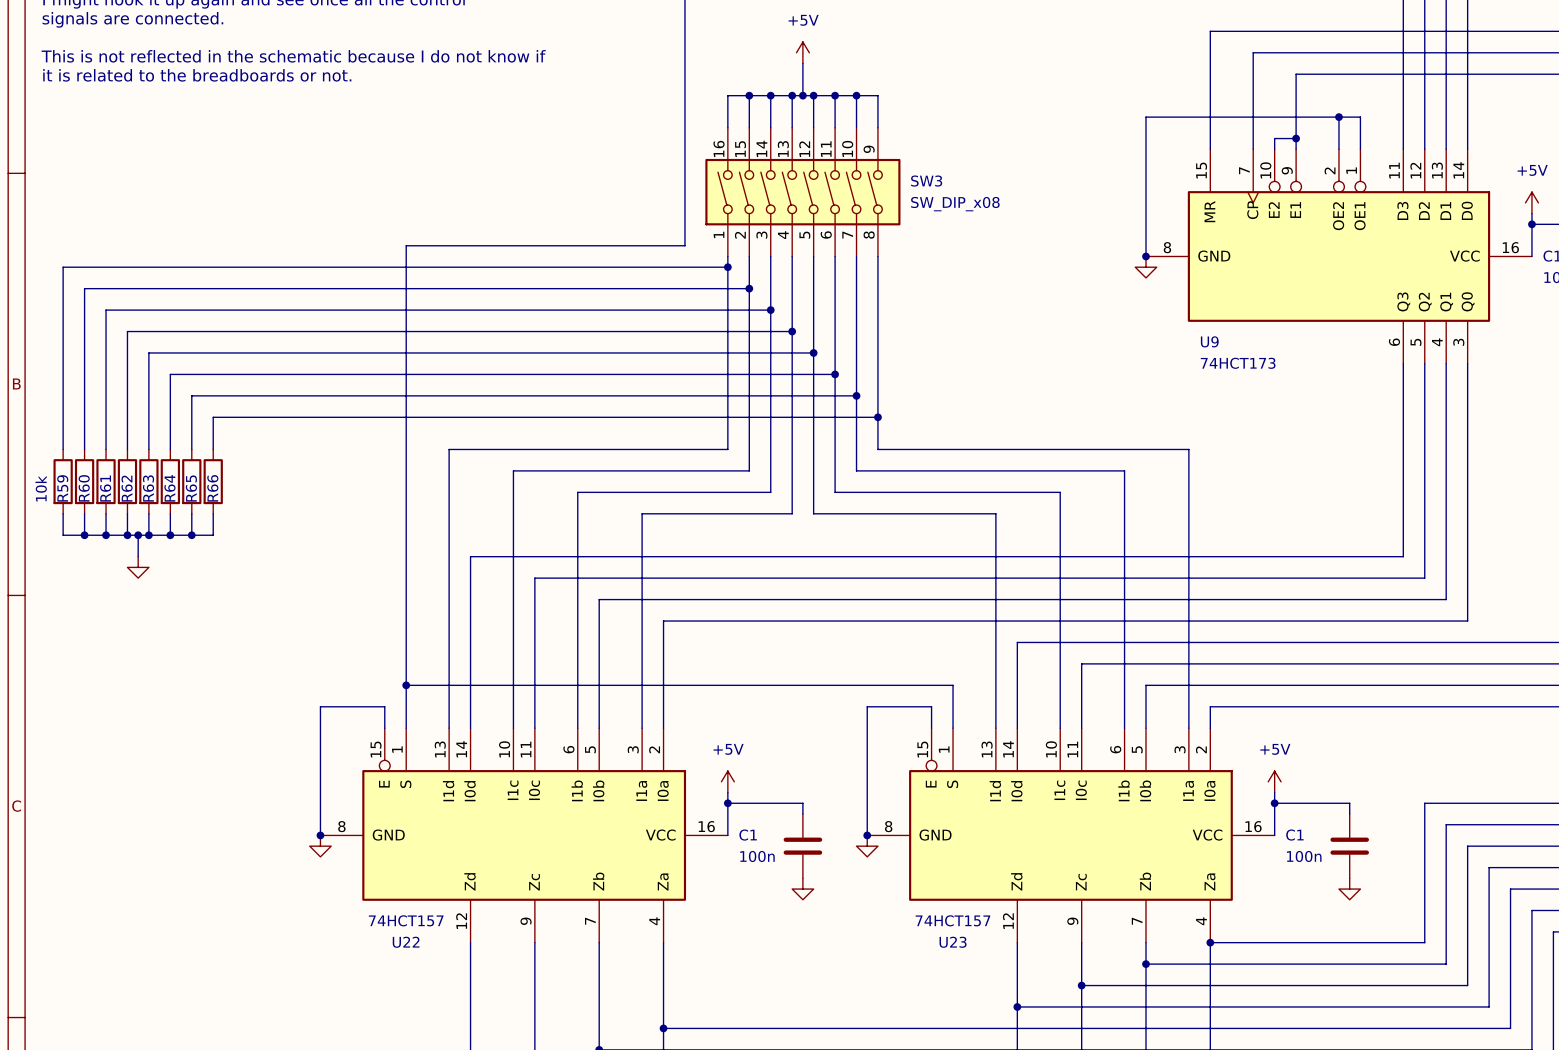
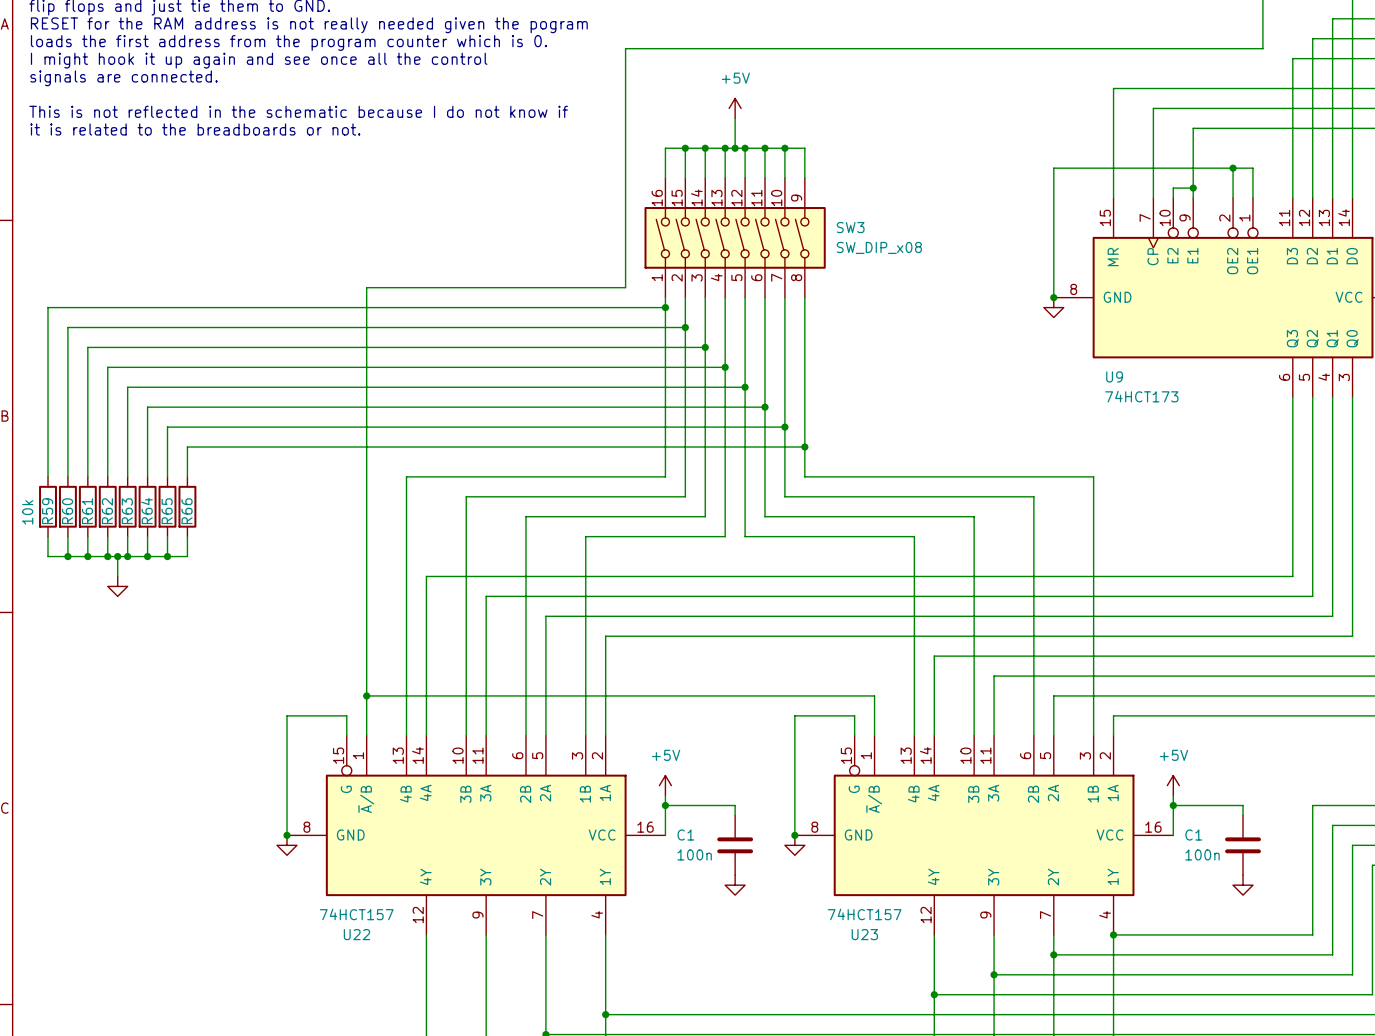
U22 symbol: [320, 728, 728, 943] -> [287, 735, 666, 935]
U23 symbol: [867, 728, 1275, 943] -> [794, 735, 1174, 935]

